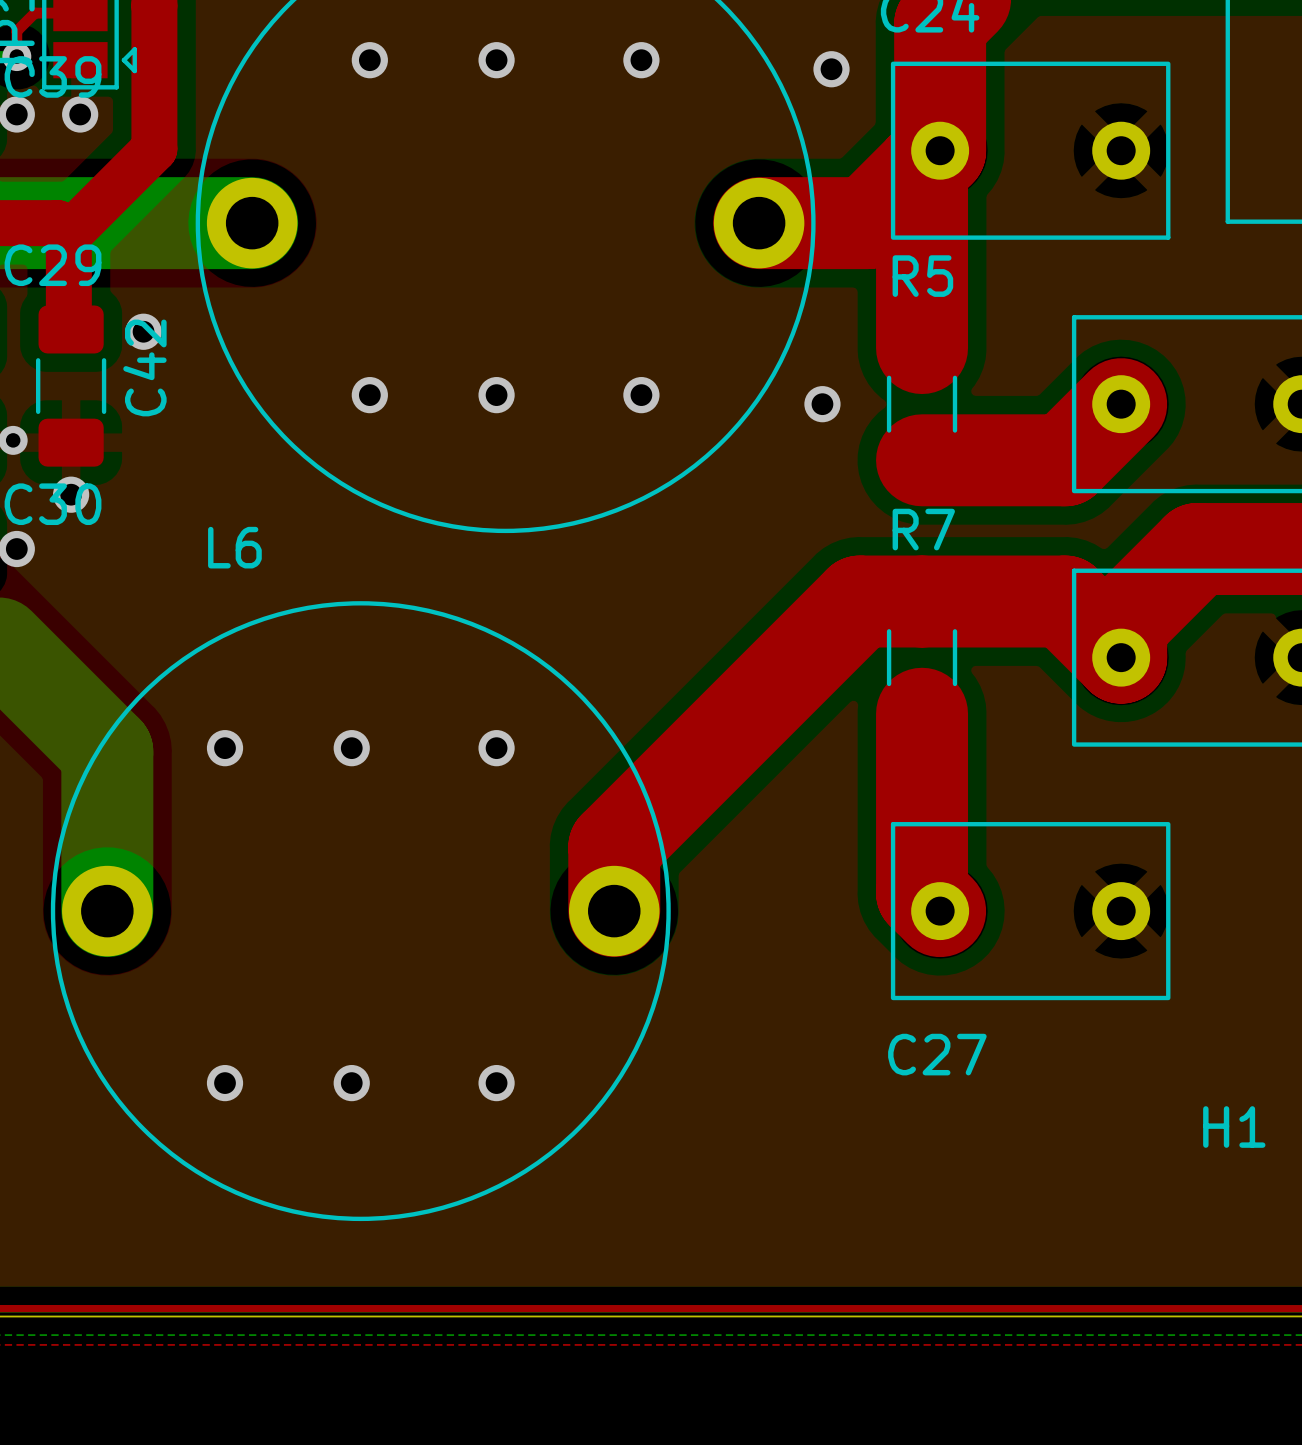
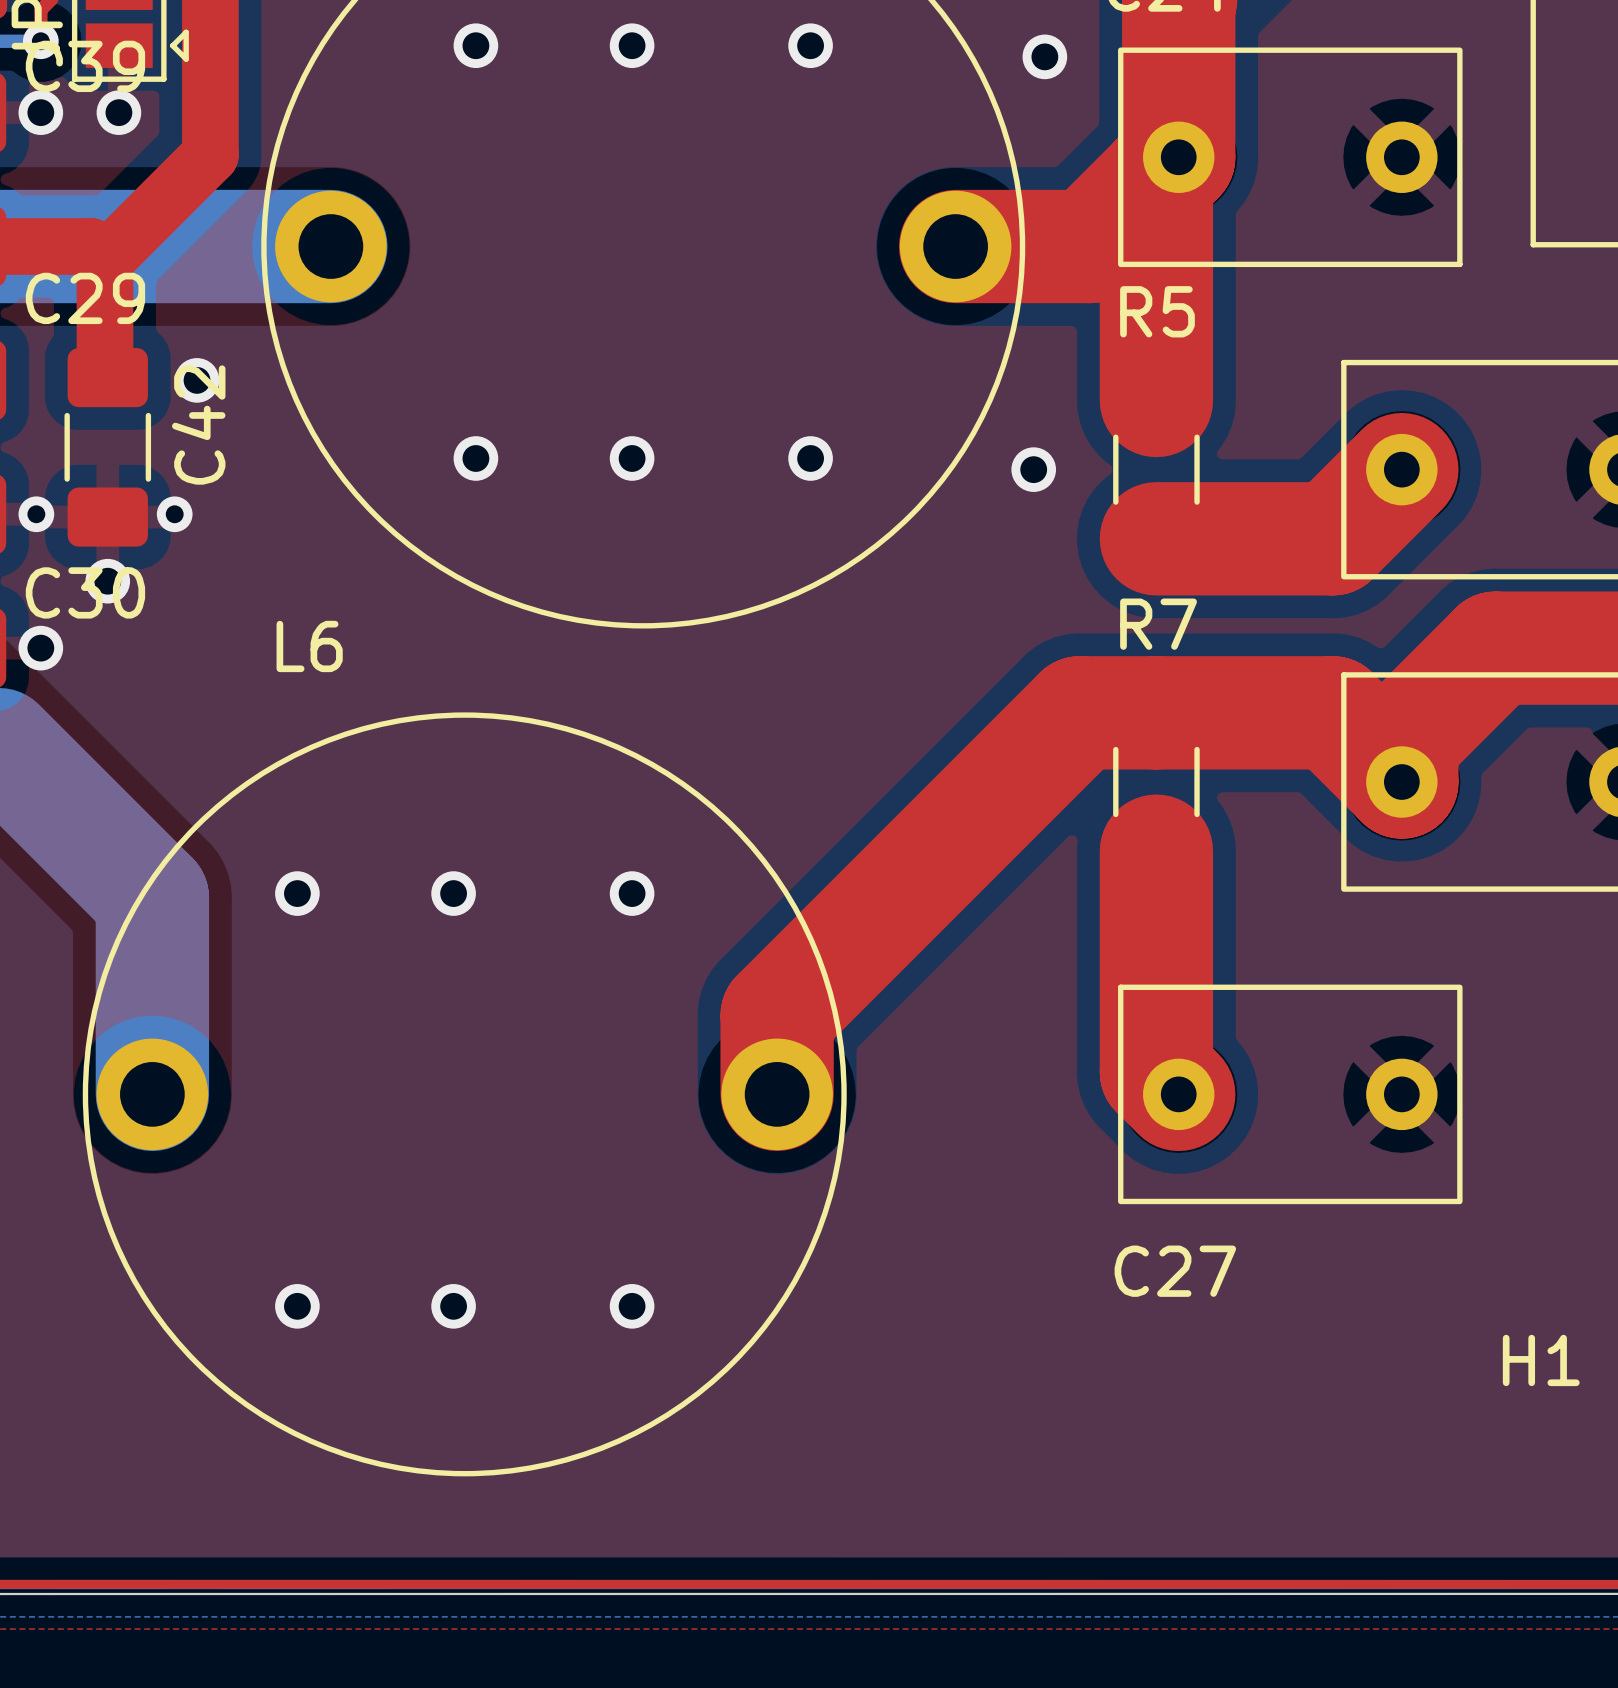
via: none -> (174, 514)

